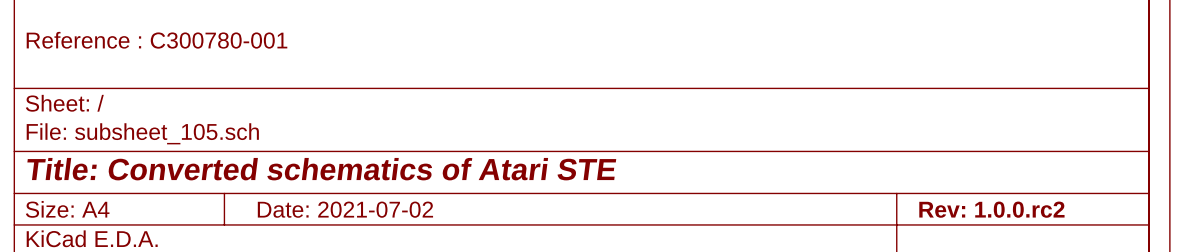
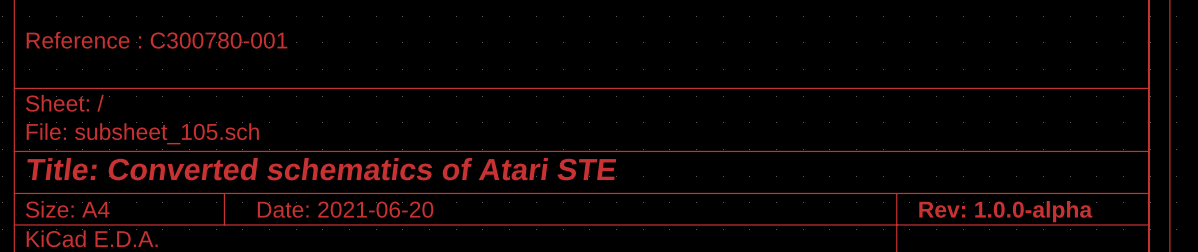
title block: Date: 2021-07-02 (345, 209) -> Date: 2021-06-20 (345, 209)
title block: Rev: 1.0.0.rc2 (991, 209) -> Rev: 1.0.0-alpha (1005, 211)

